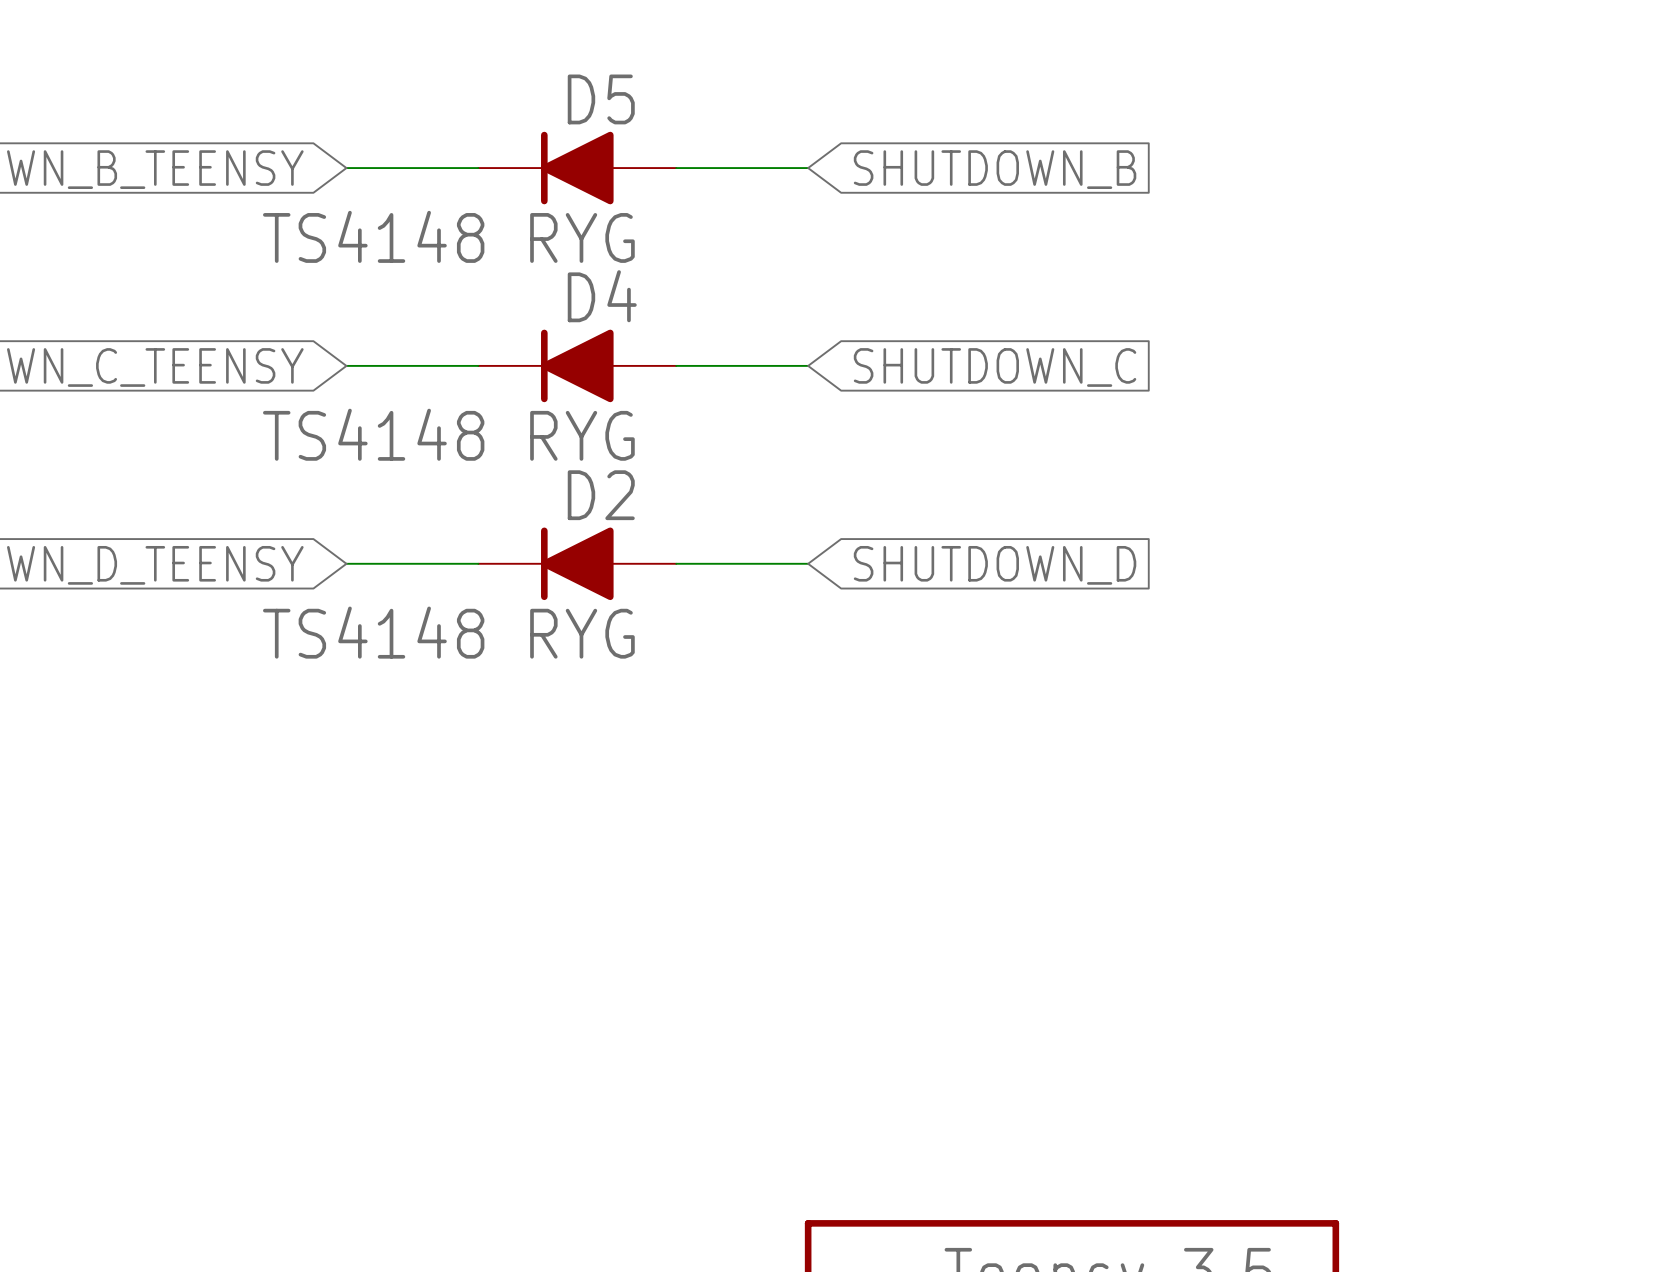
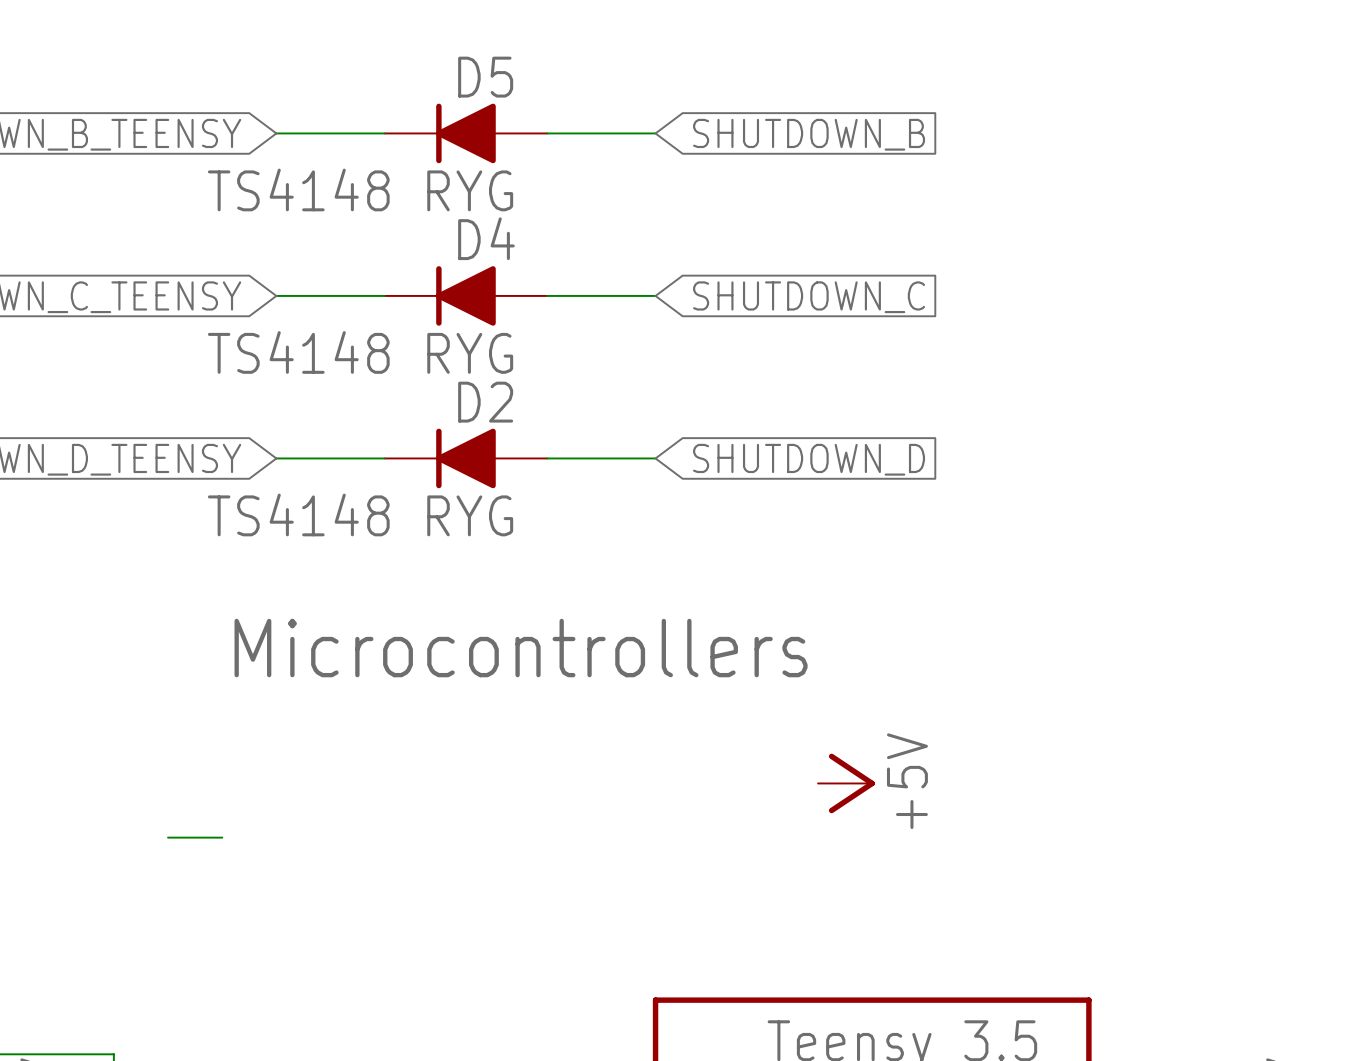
text: none -> Microcontrollers (521, 648)
power symbol: none -> +5V (846, 783)
wire: none -> (168, 837) (222, 837)

